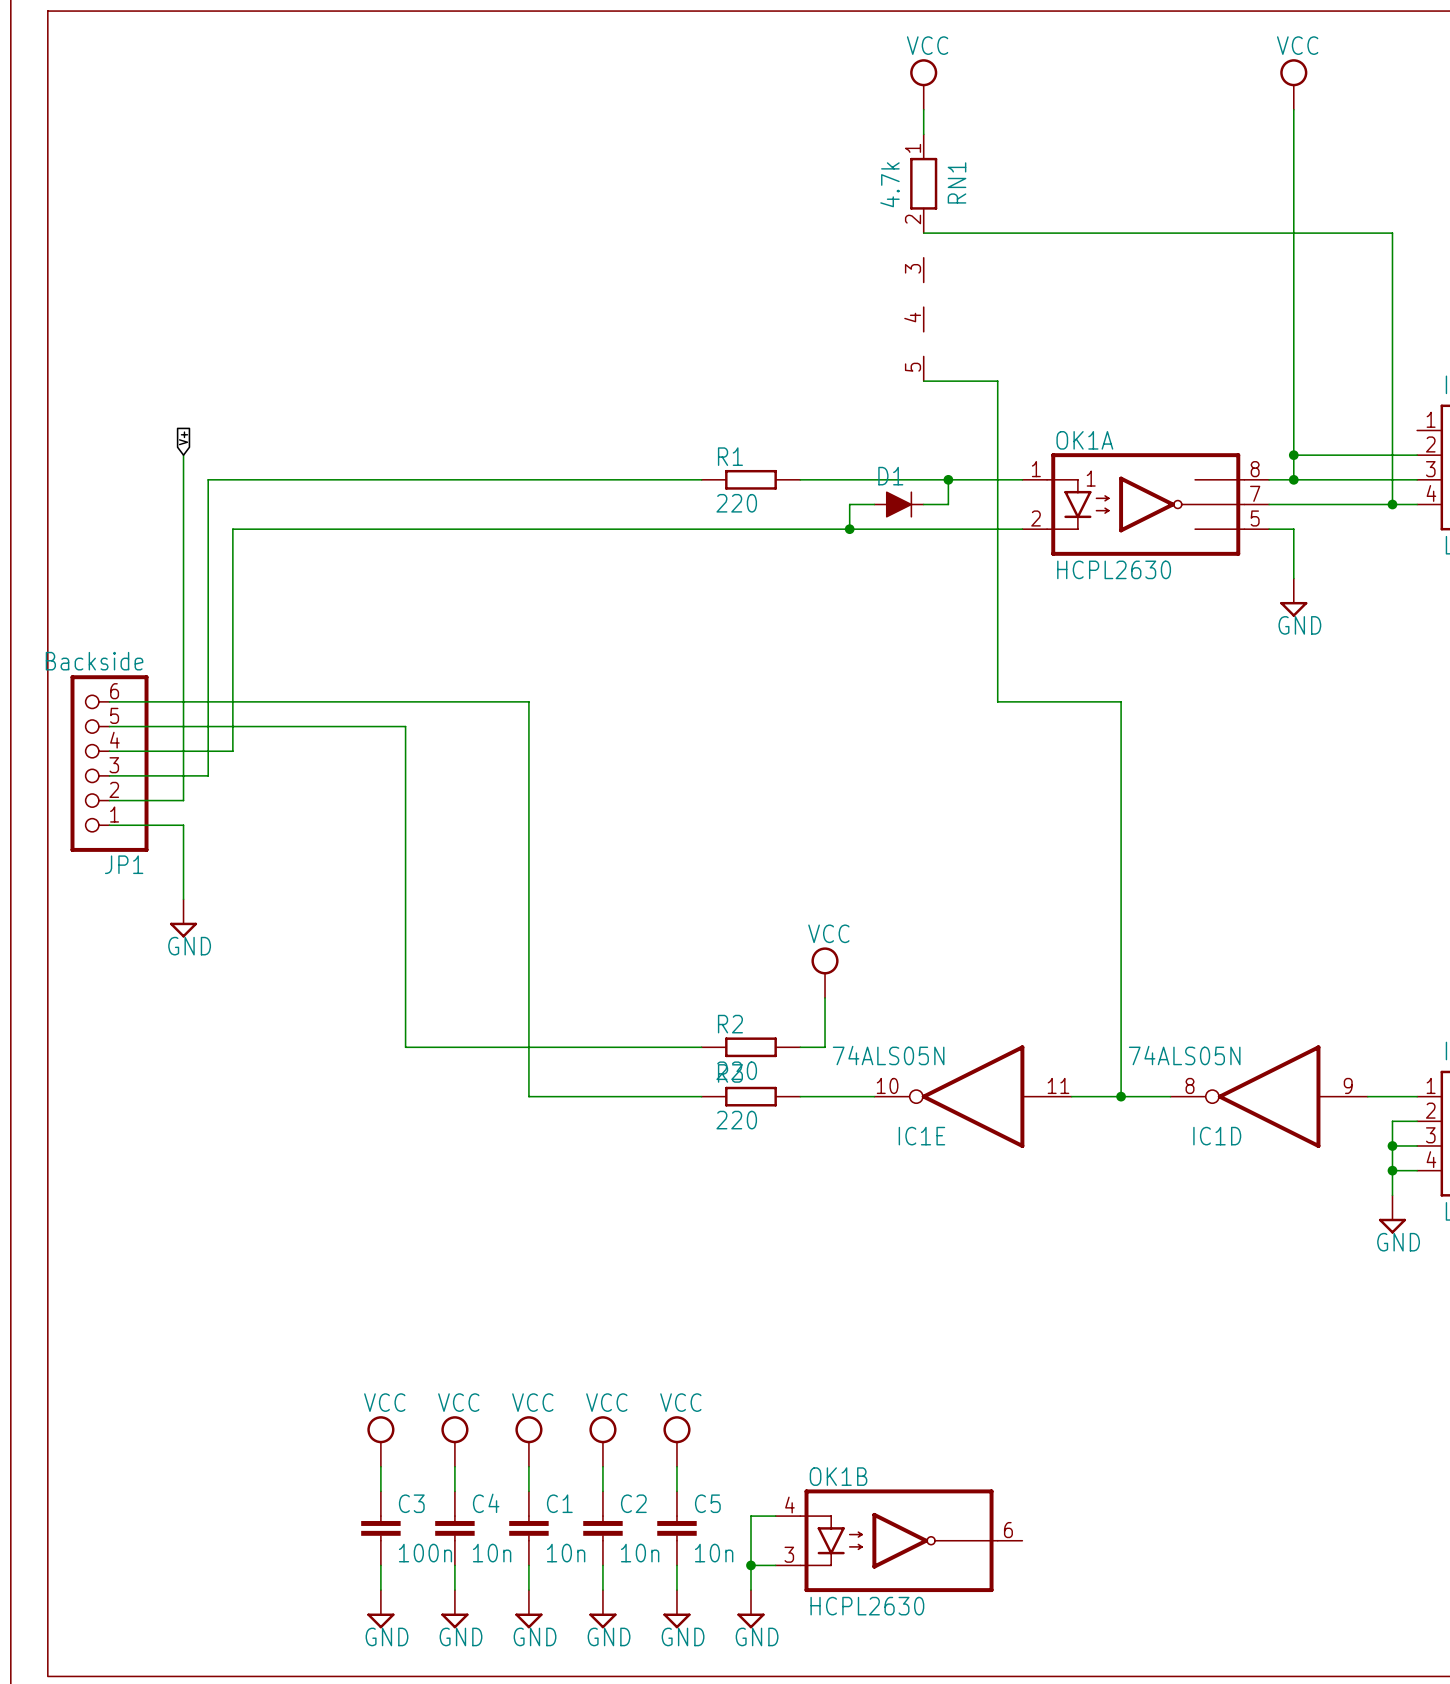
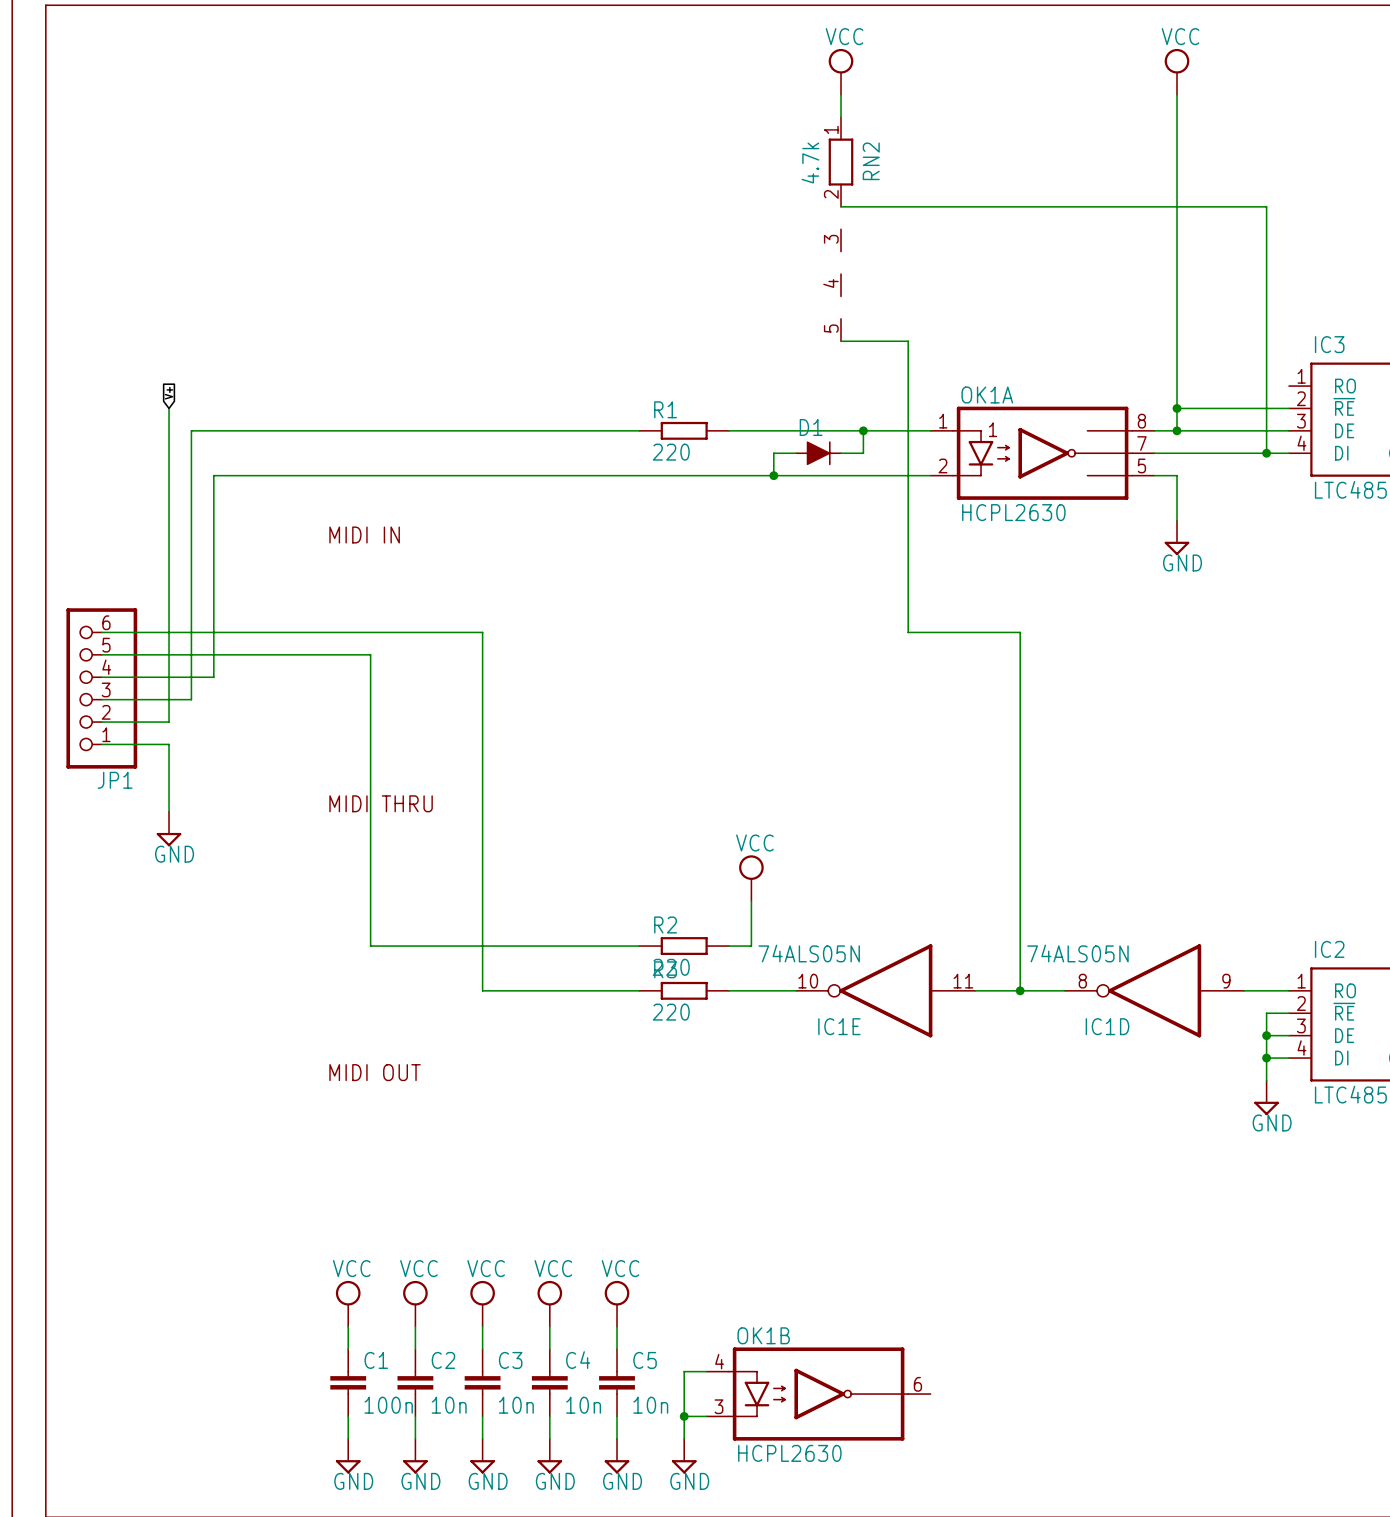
RN1 name: RN1 (957, 182) -> RN2 (871, 161)
text: none -> MIDI IN (364, 535)
JP1 value: Backside (94, 661) -> none
text: none -> MIDI THRU (381, 803)
text: none -> MIDI OUT (375, 1072)
C3 name: C3 (411, 1503) -> C1 (376, 1360)
C4 name: C4 (486, 1503) -> C2 (443, 1360)
C1 name: C1 (559, 1503) -> C3 (510, 1360)
C2 name: C2 (633, 1503) -> C4 (578, 1360)

